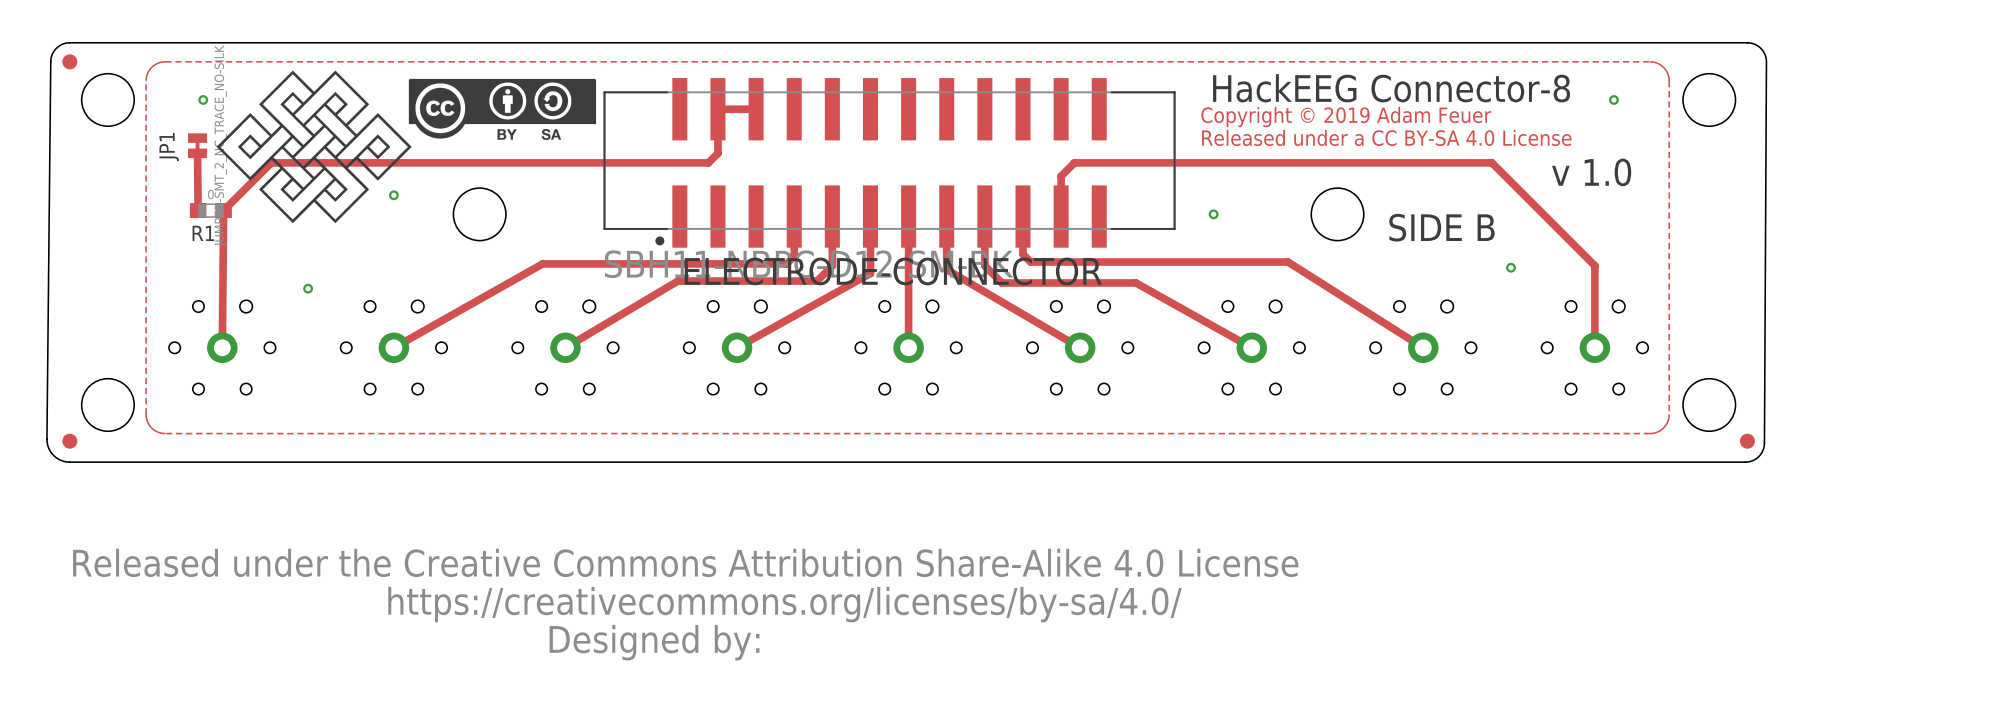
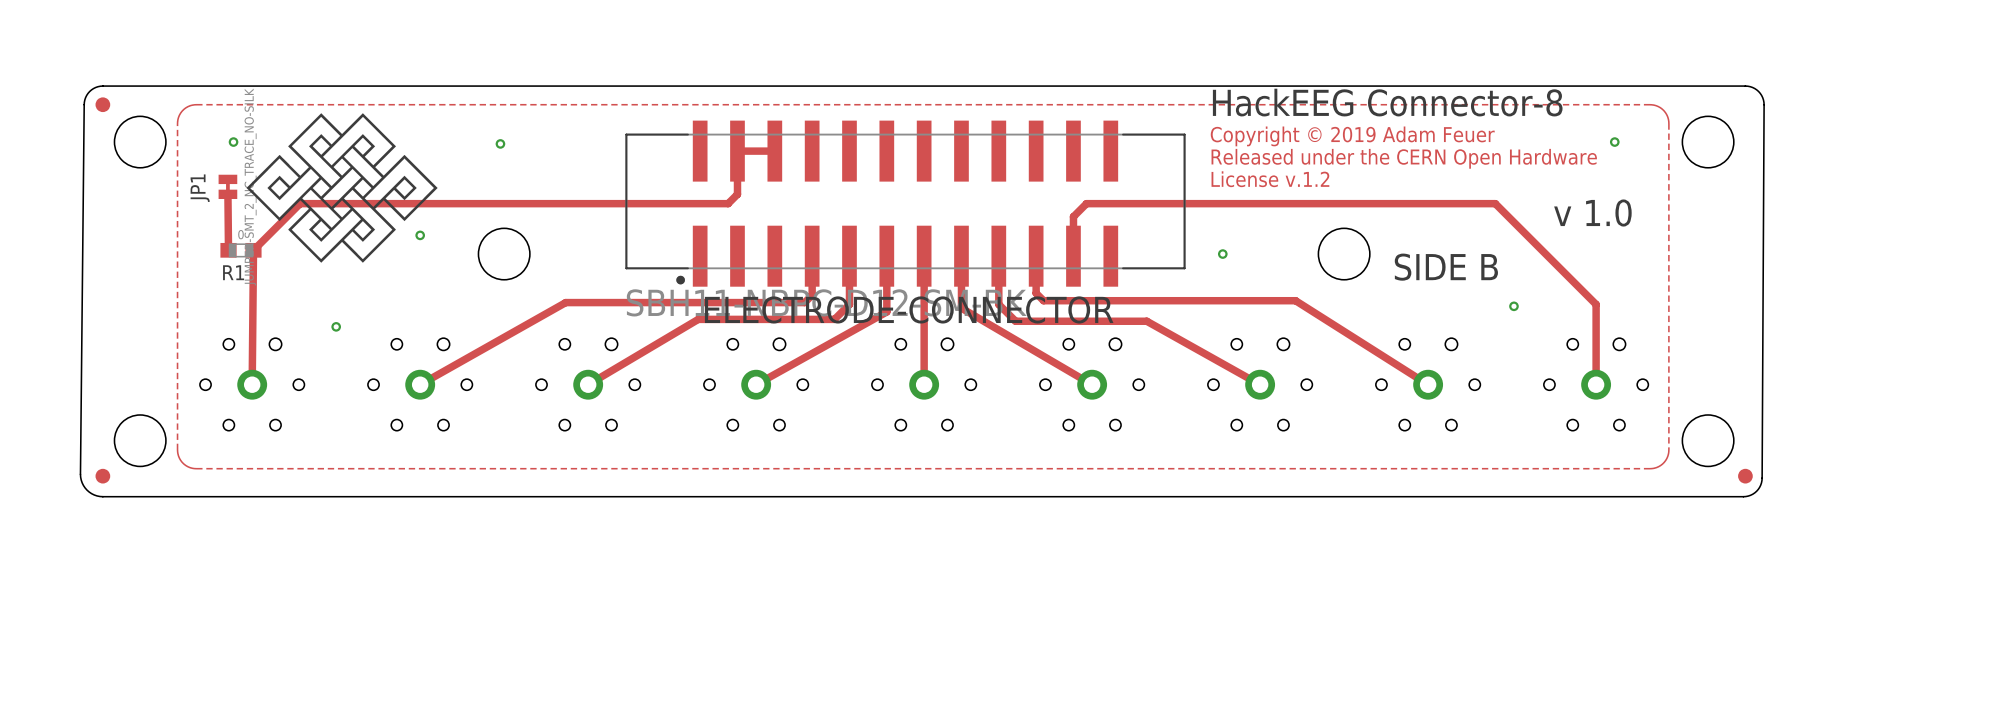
text: none -> HackEEG Connector-8 (1387, 102)
drawing: [408, 78, 597, 140] -> none
text: HackEEG Connector-8 (1391, 88) -> Copyright © 2019 Adam Feuer (1352, 136)
text: Copyright © 2019 Adam Feuer (1346, 117) -> Released under the CERN Open Hardware (1404, 158)
text: Released under a CC BY-SA 4.0 License (1386, 137) -> License v.1.2 (1270, 179)
drawing: [73, 548, 1299, 661] -> none

